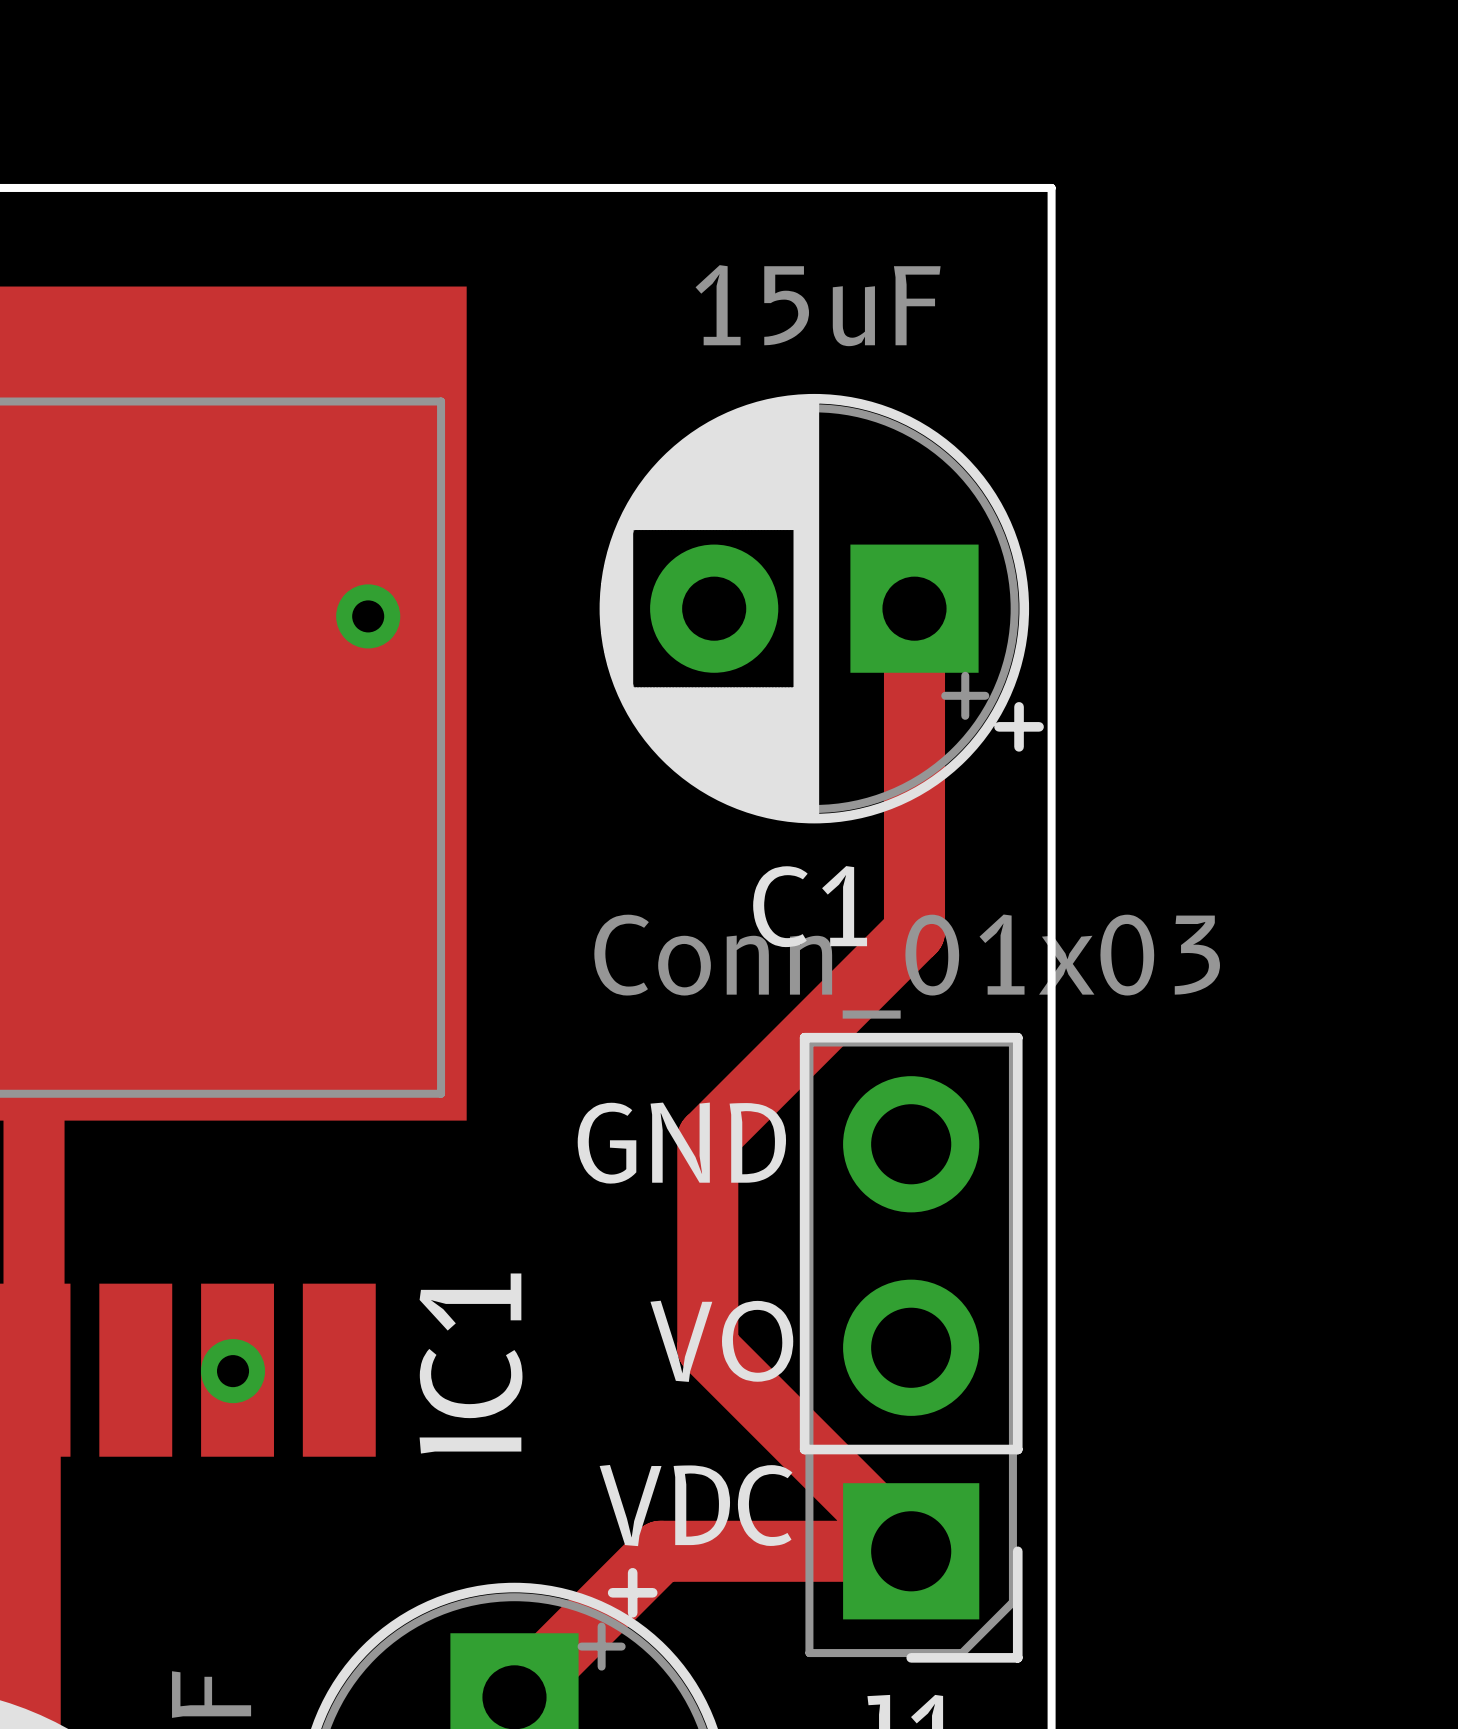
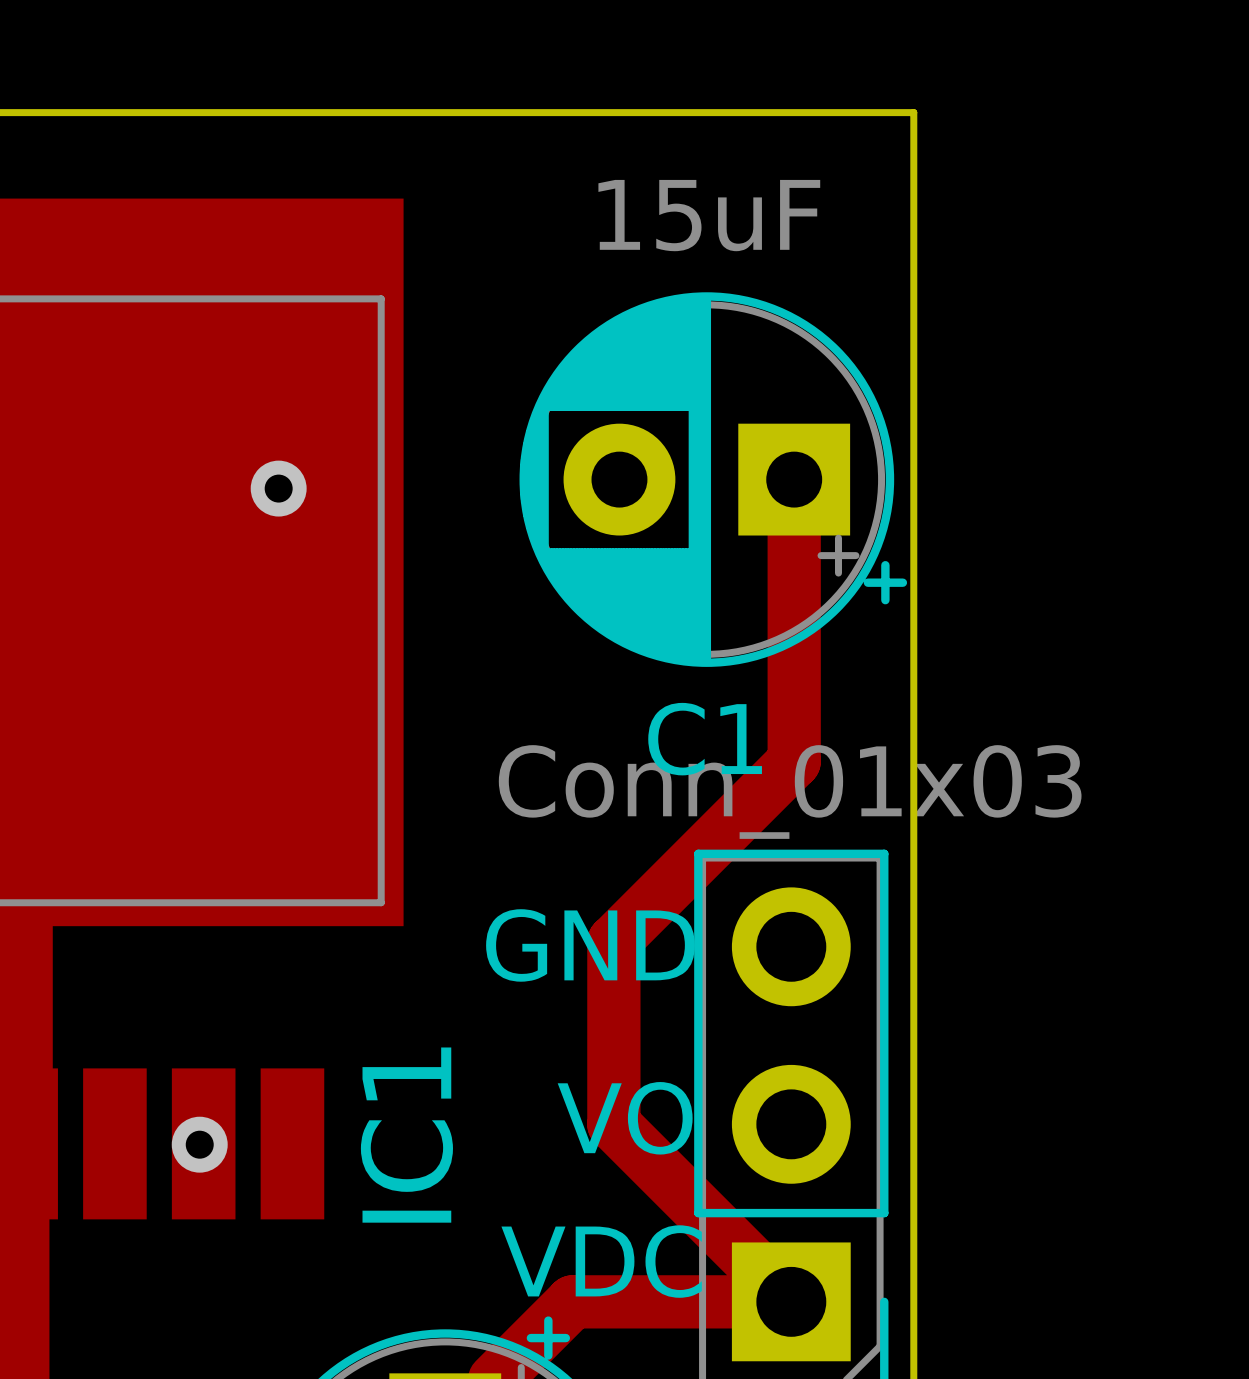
via position: (368, 616) -> (278, 488)

